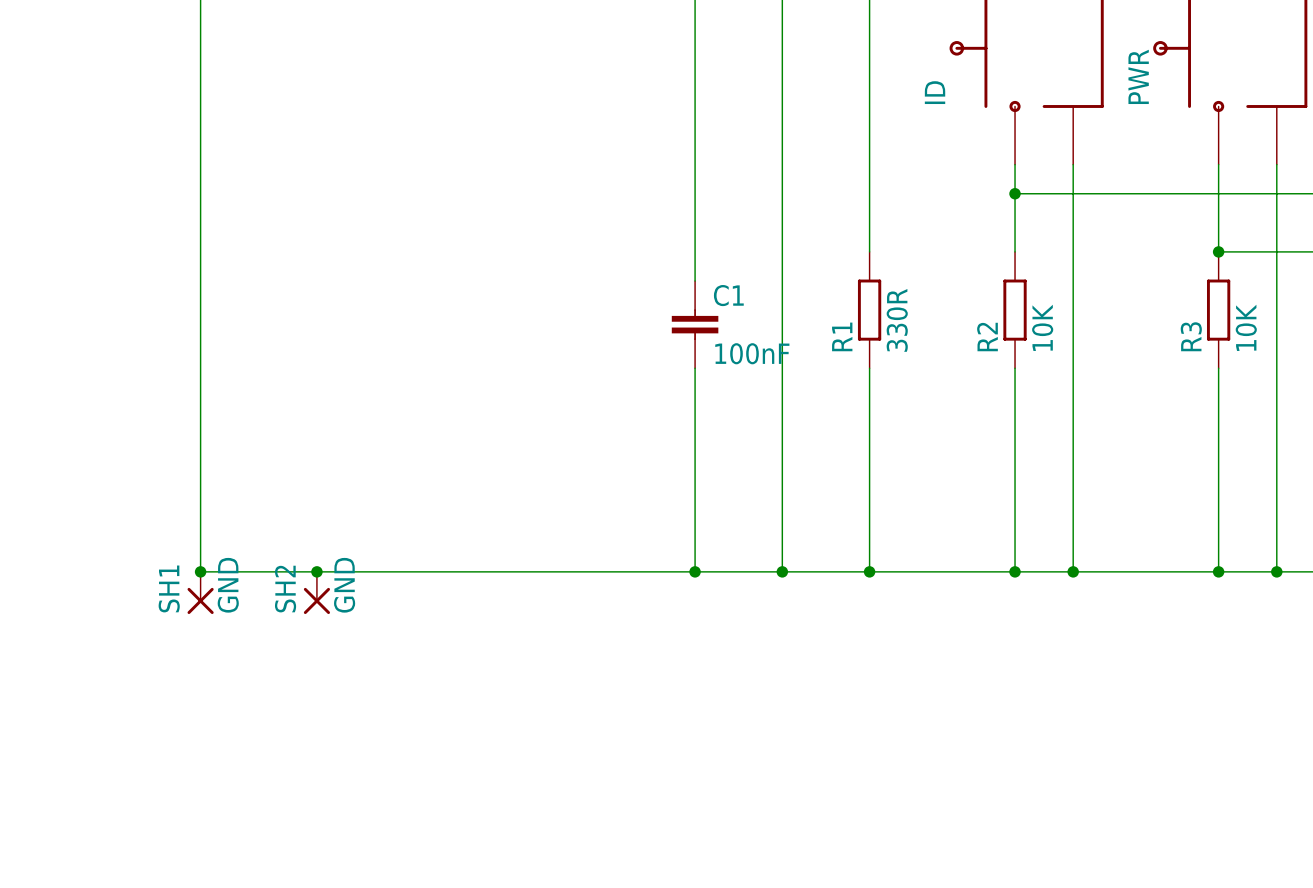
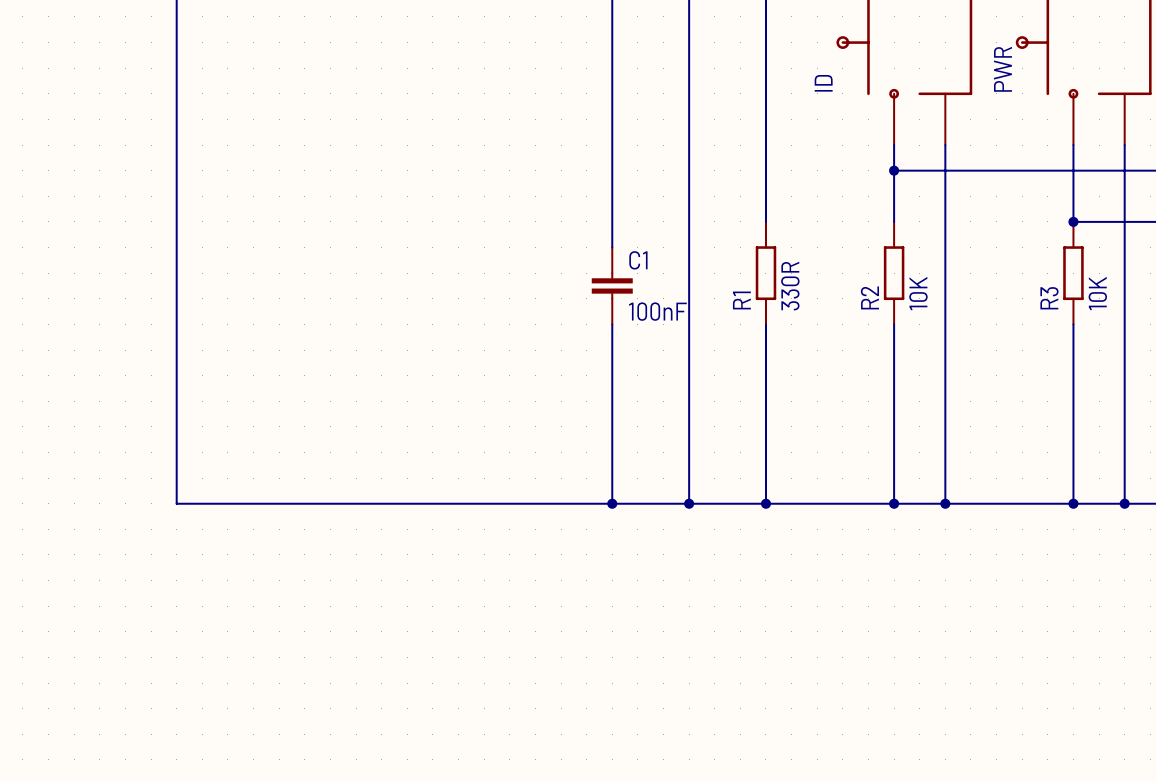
junction: (200, 571) -> none
junction: (316, 571) -> none
SH1: GND (200, 592) -> none
SH2: GND (316, 592) -> none

